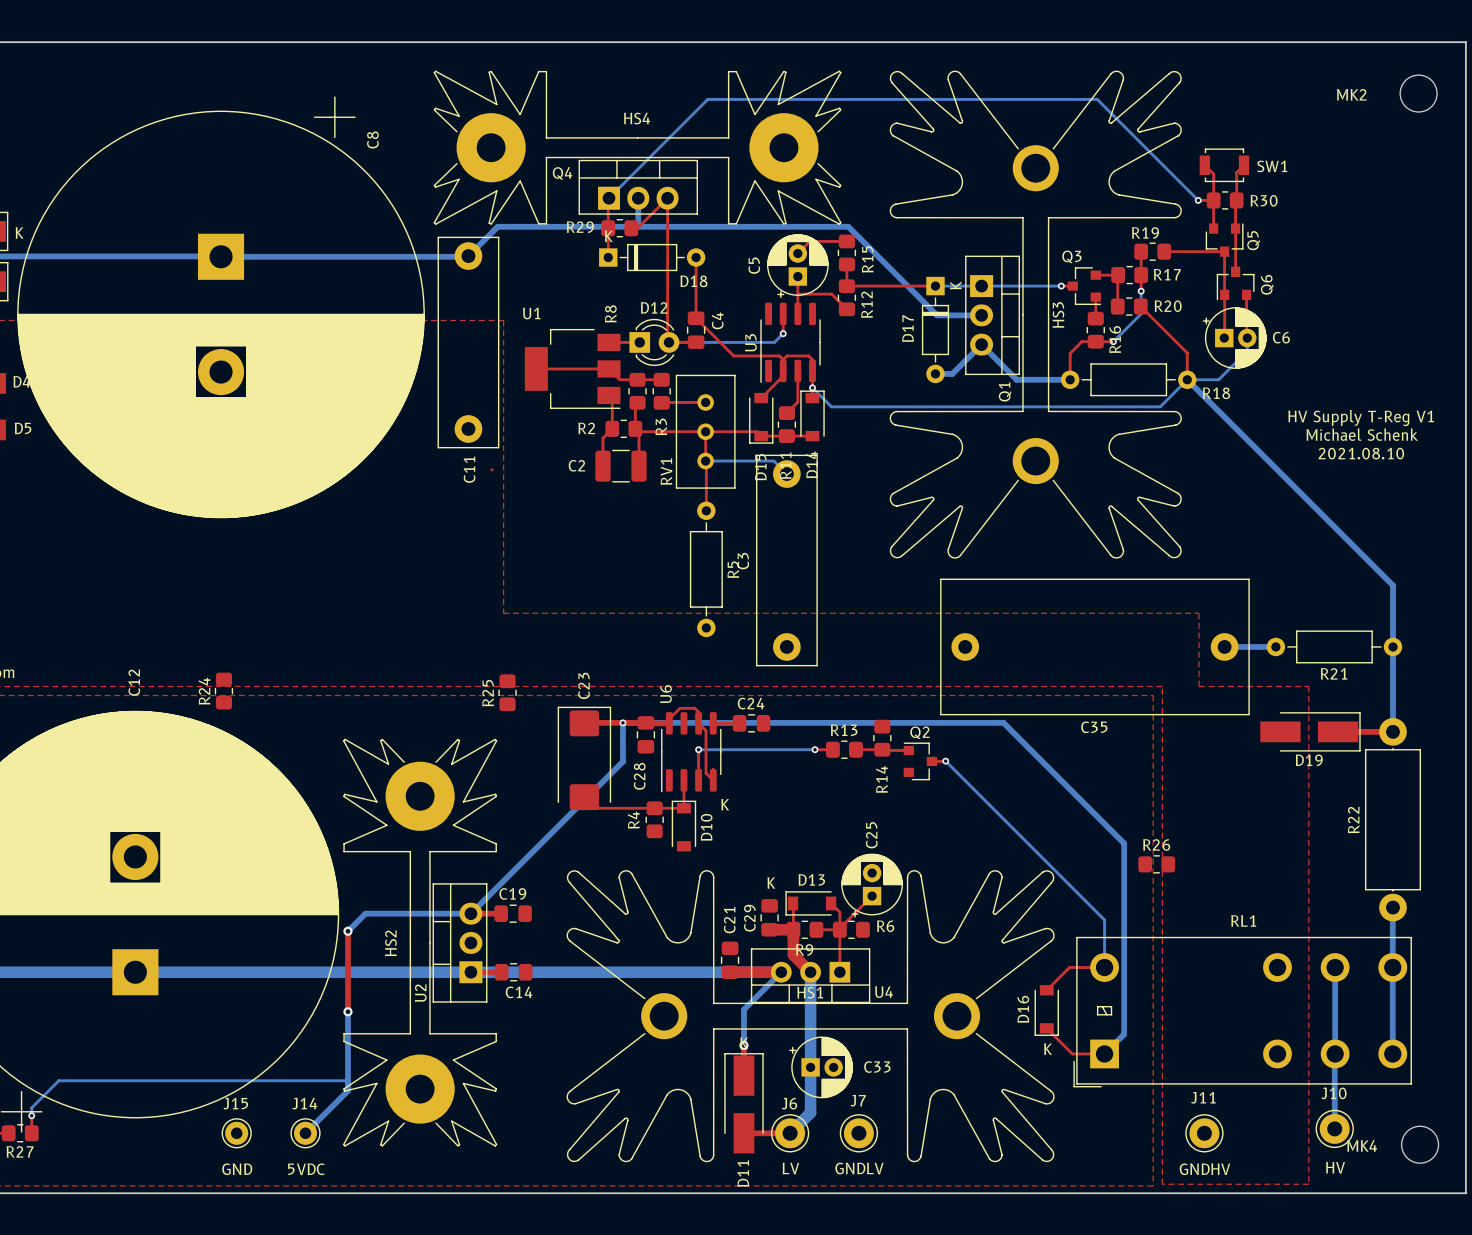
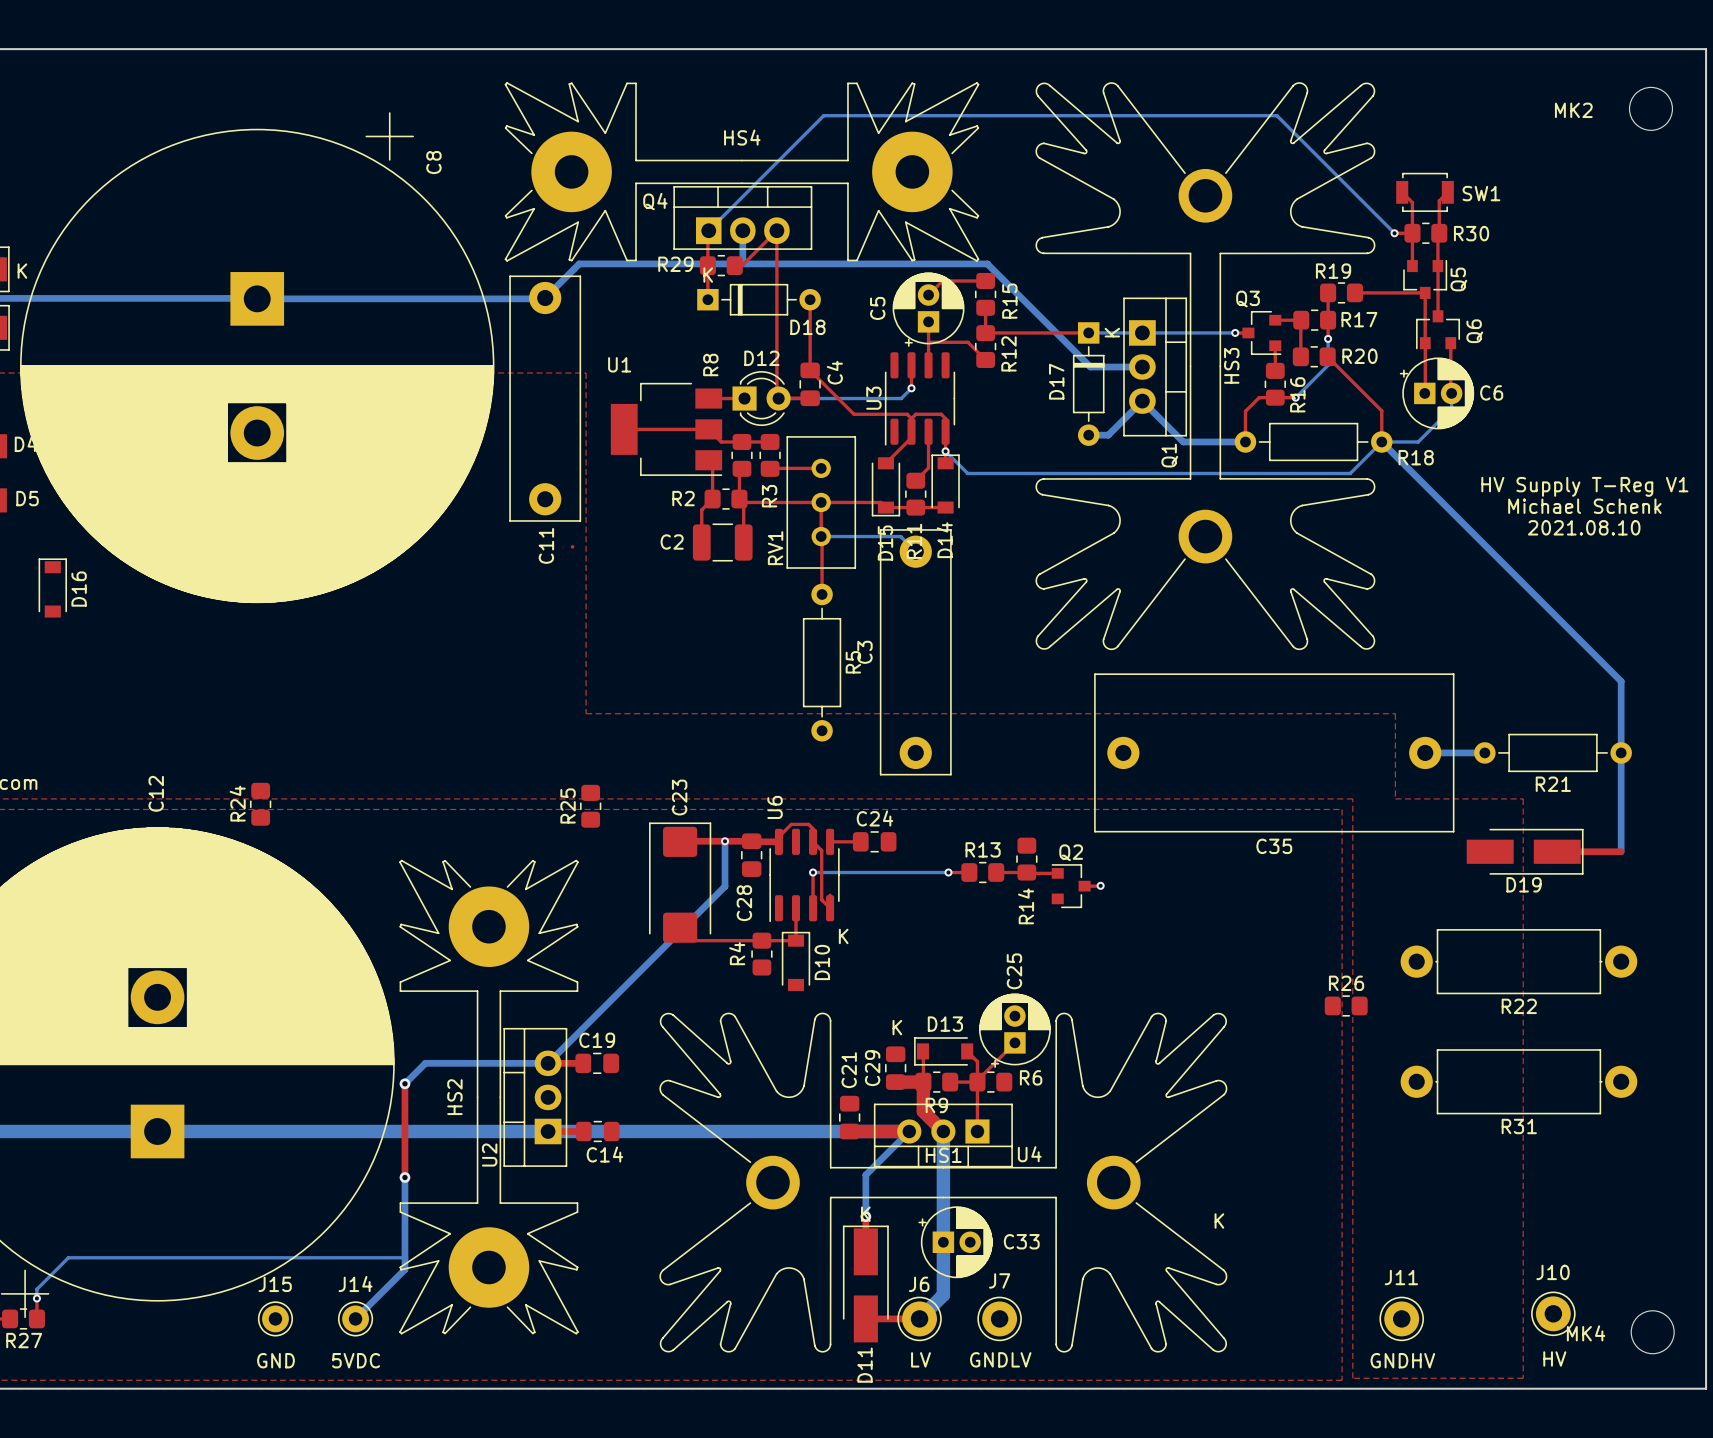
bottom track: (622, 722) (1003, 722) (1124, 843) (1124, 1034) (1104, 1053) -> none
bottom track: (945, 761) (1104, 920) (1104, 967) -> none
R22 rotation: 0° (1392, 819) -> 90° clockwise (1518, 961)
R22 name position: R22 (1353, 820) -> R22 (1519, 1006)
bottom track: (1392, 907) (1392, 1053) -> none
R31: none -> (1518, 1081)
top track: (1104, 967) (1069, 967) (1046, 990) -> none
bottom track: (1335, 967) (1334, 1128) -> none
D16 rotation: 0° (1046, 1010) -> 180° (52, 587)
D16 position: (1046, 1010) -> (52, 587)
RL1: (1242, 1012) -> none
top track: (1046, 1028) (1072, 1053) (1104, 1053) -> none

